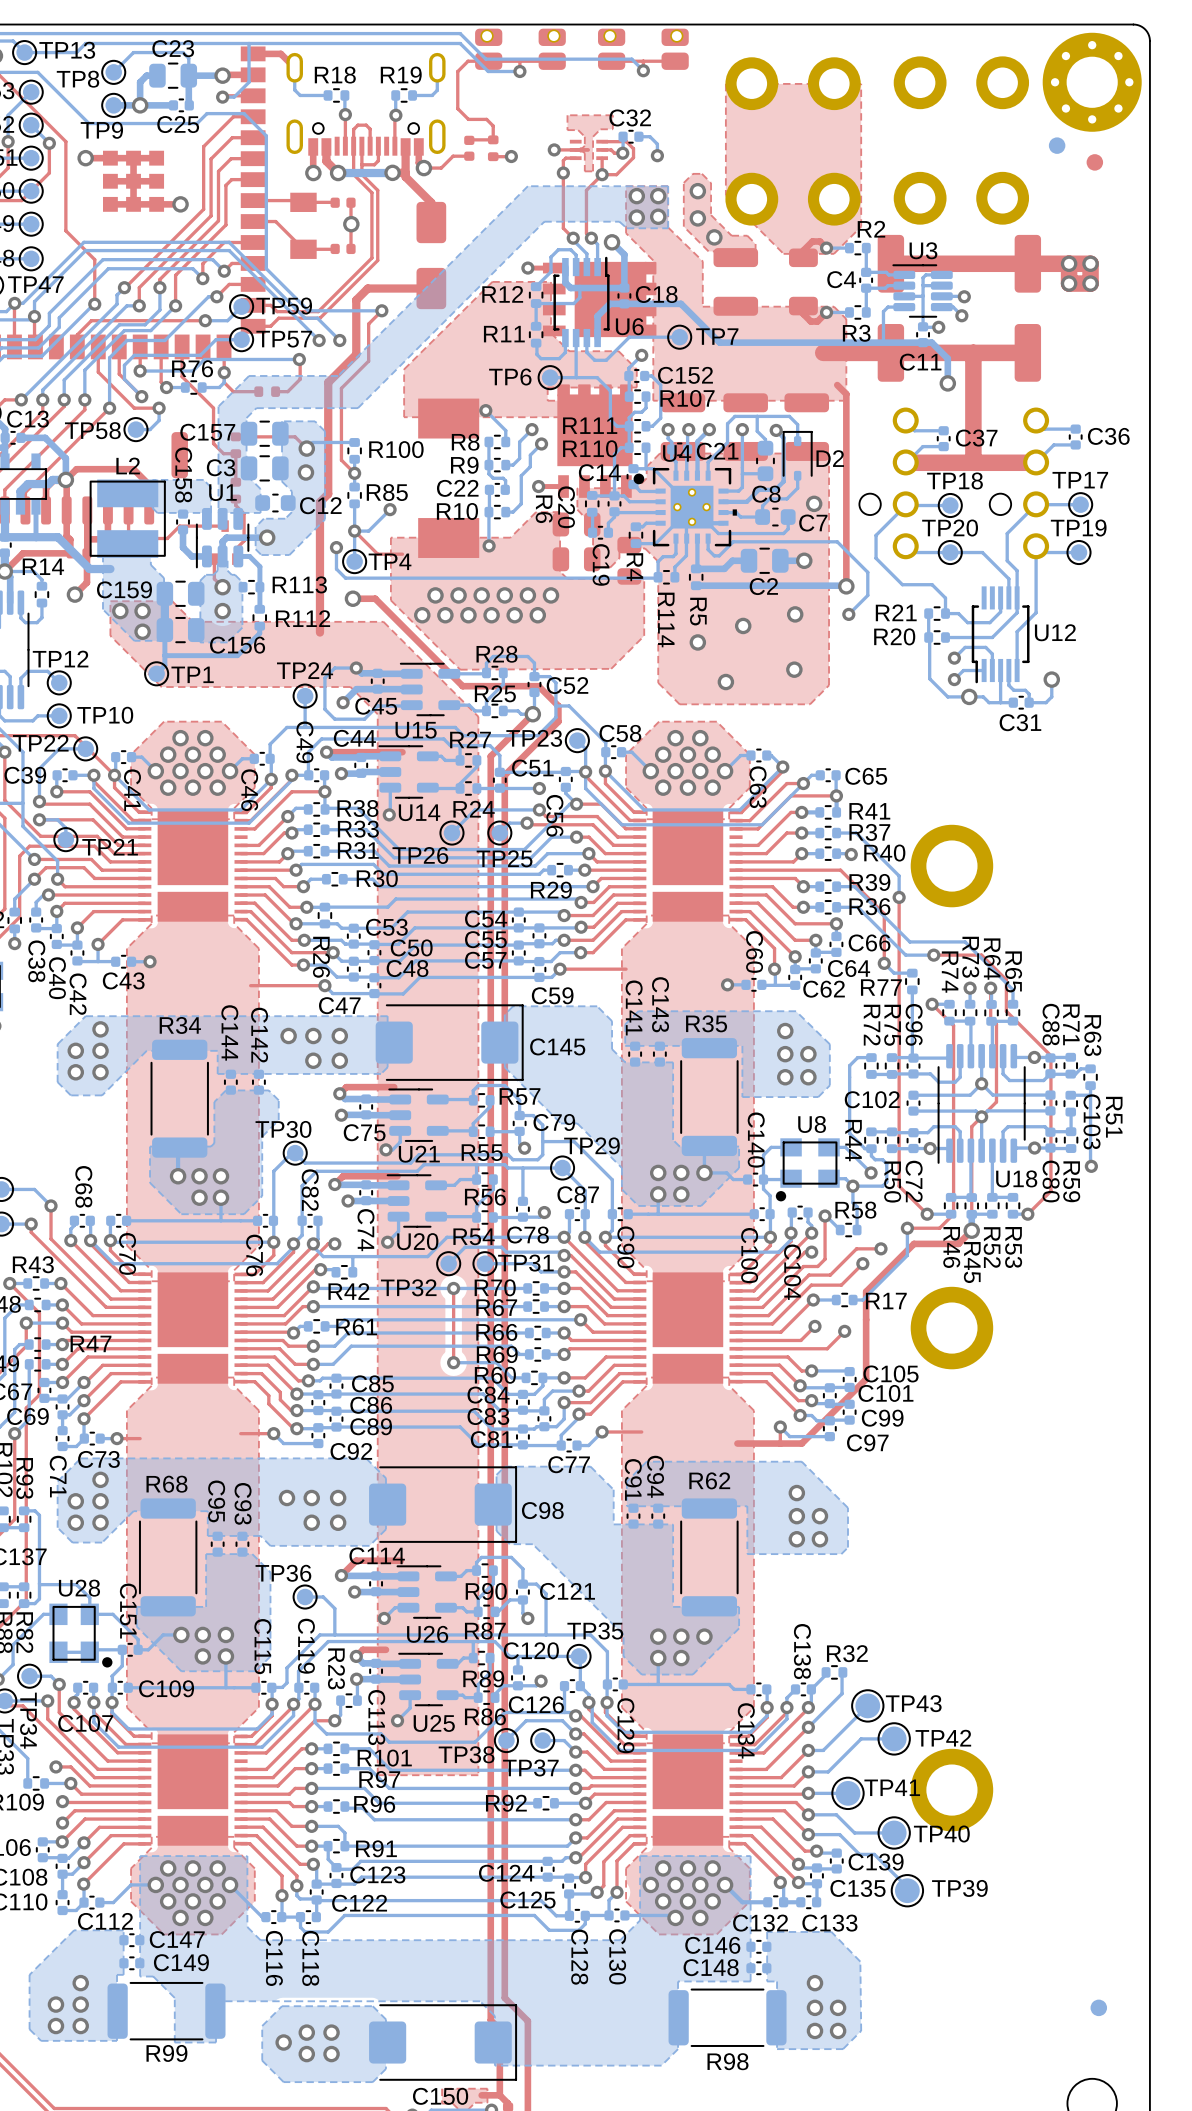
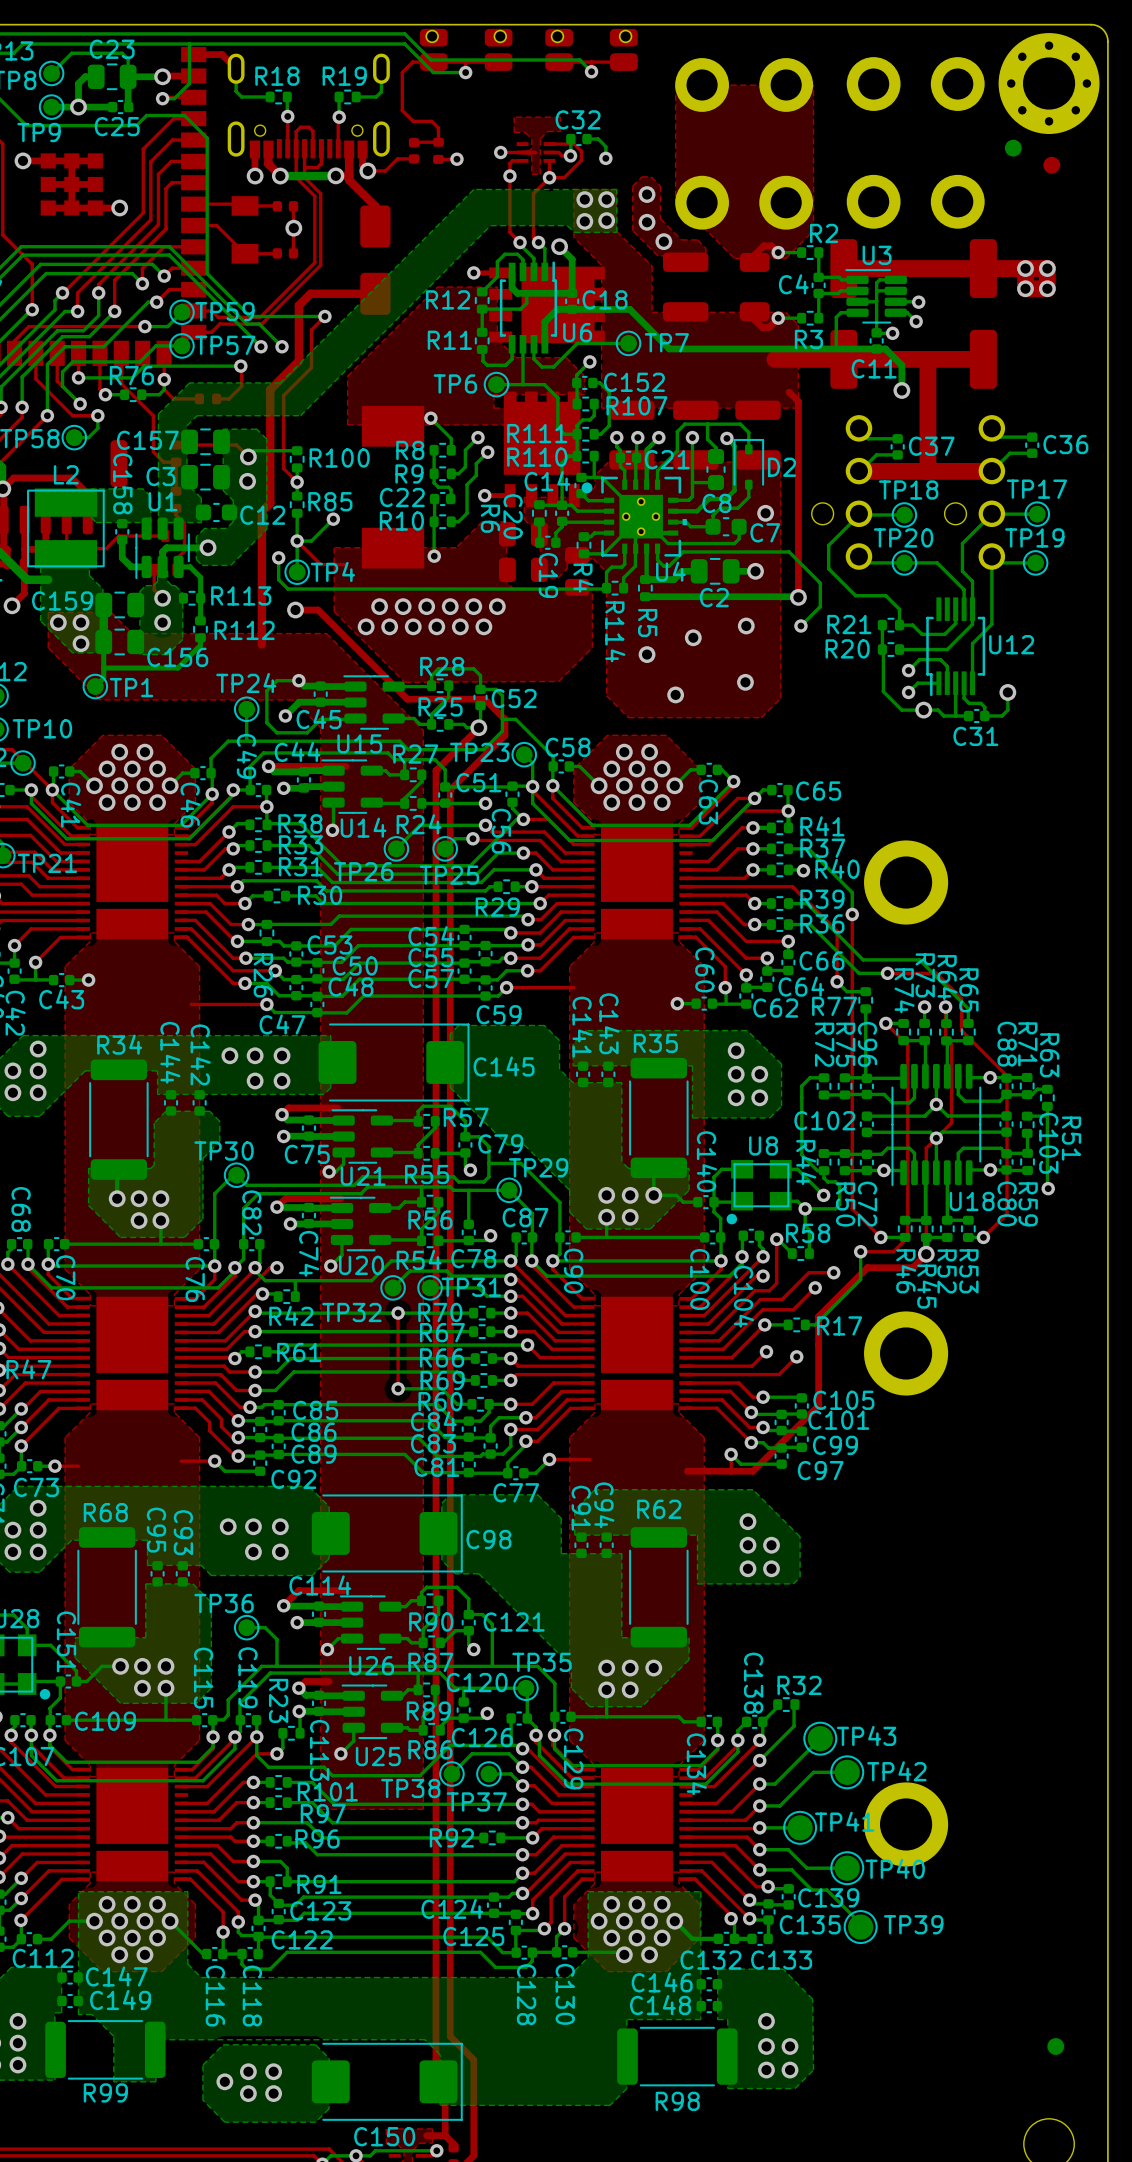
U4 name position: U4 (677, 453) -> U4 (670, 571)

